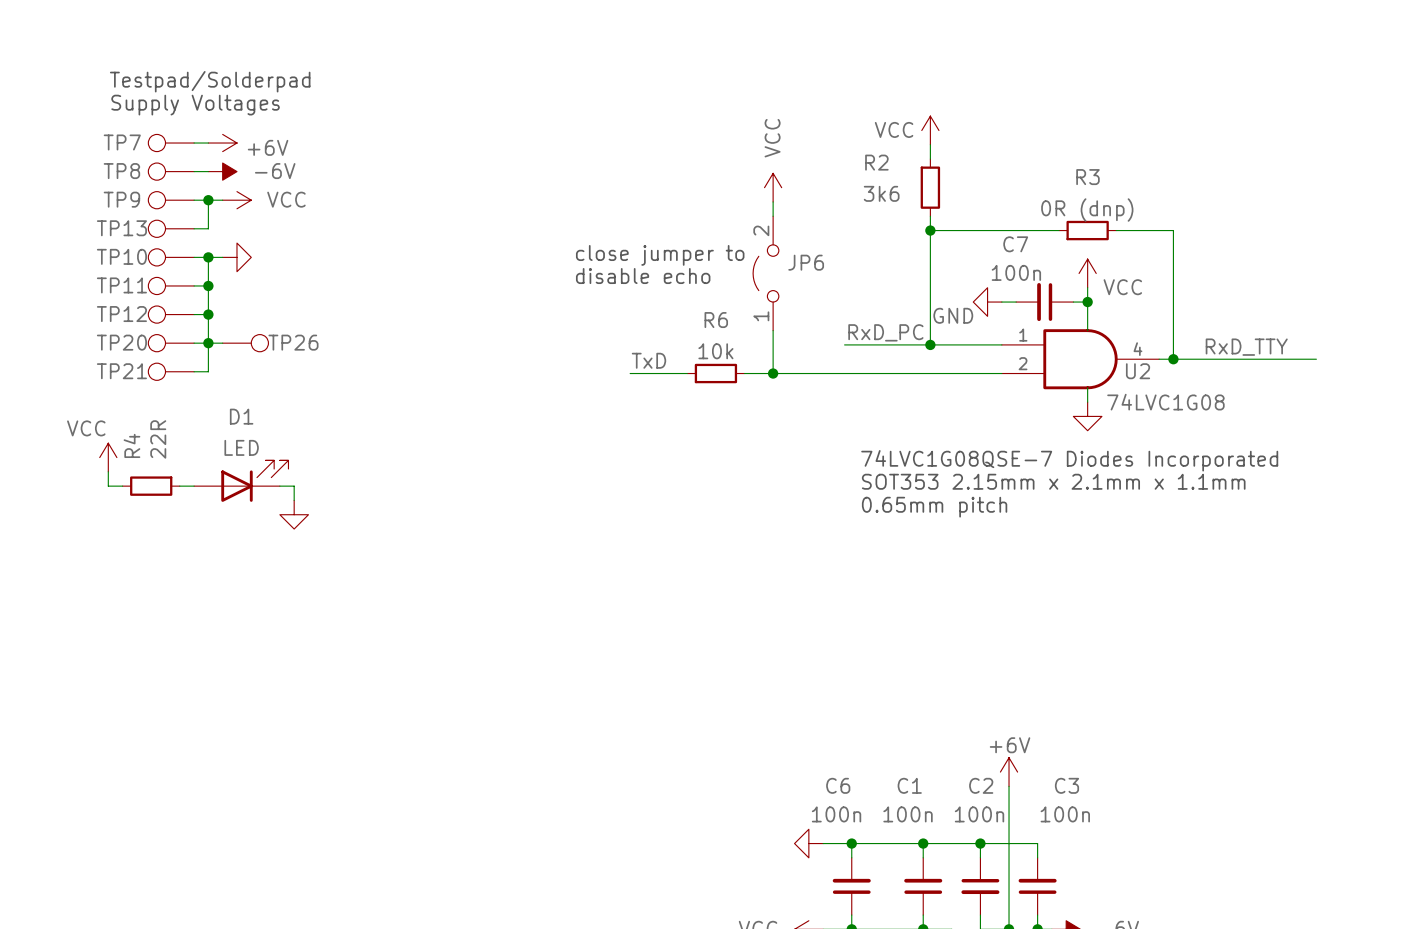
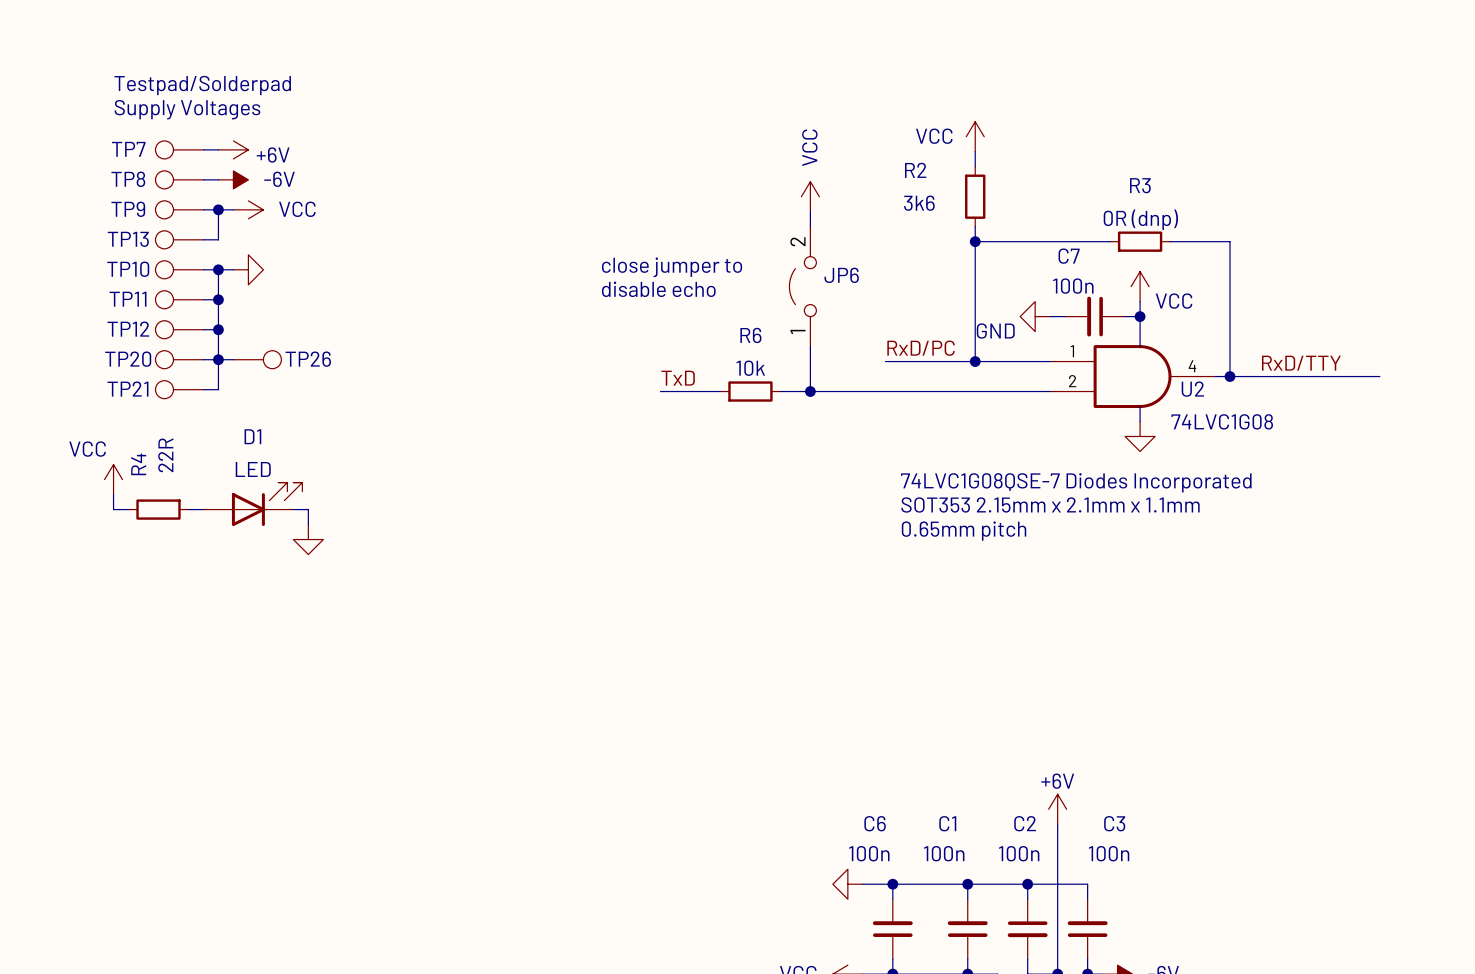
label: RxD_PC (885, 332) -> RxD/PC (921, 348)
label: RxD_TTY (1246, 347) -> RxD/TTY (1301, 363)

